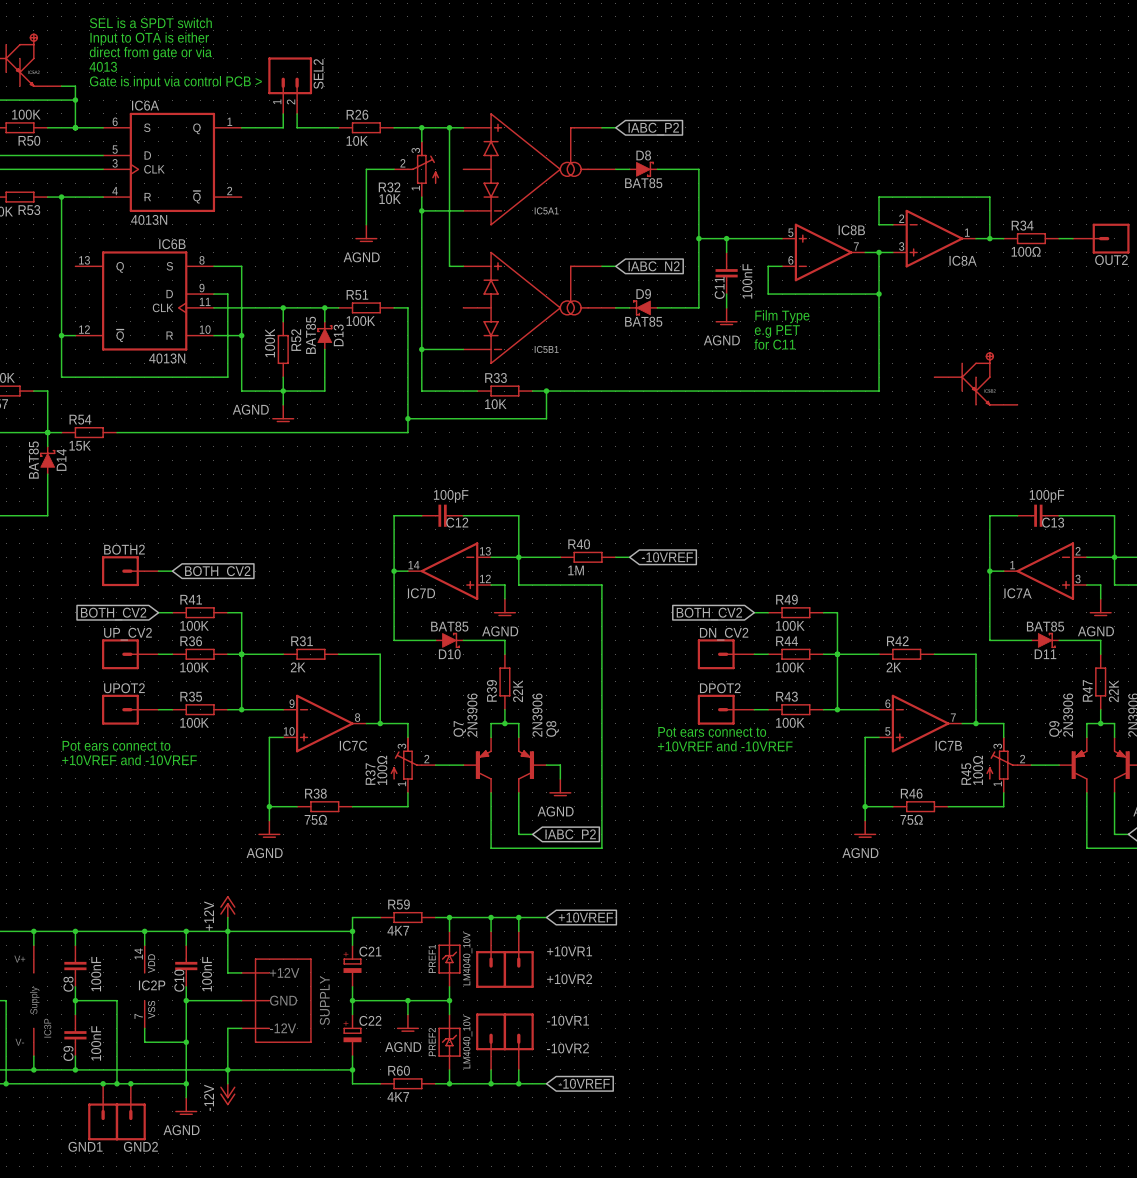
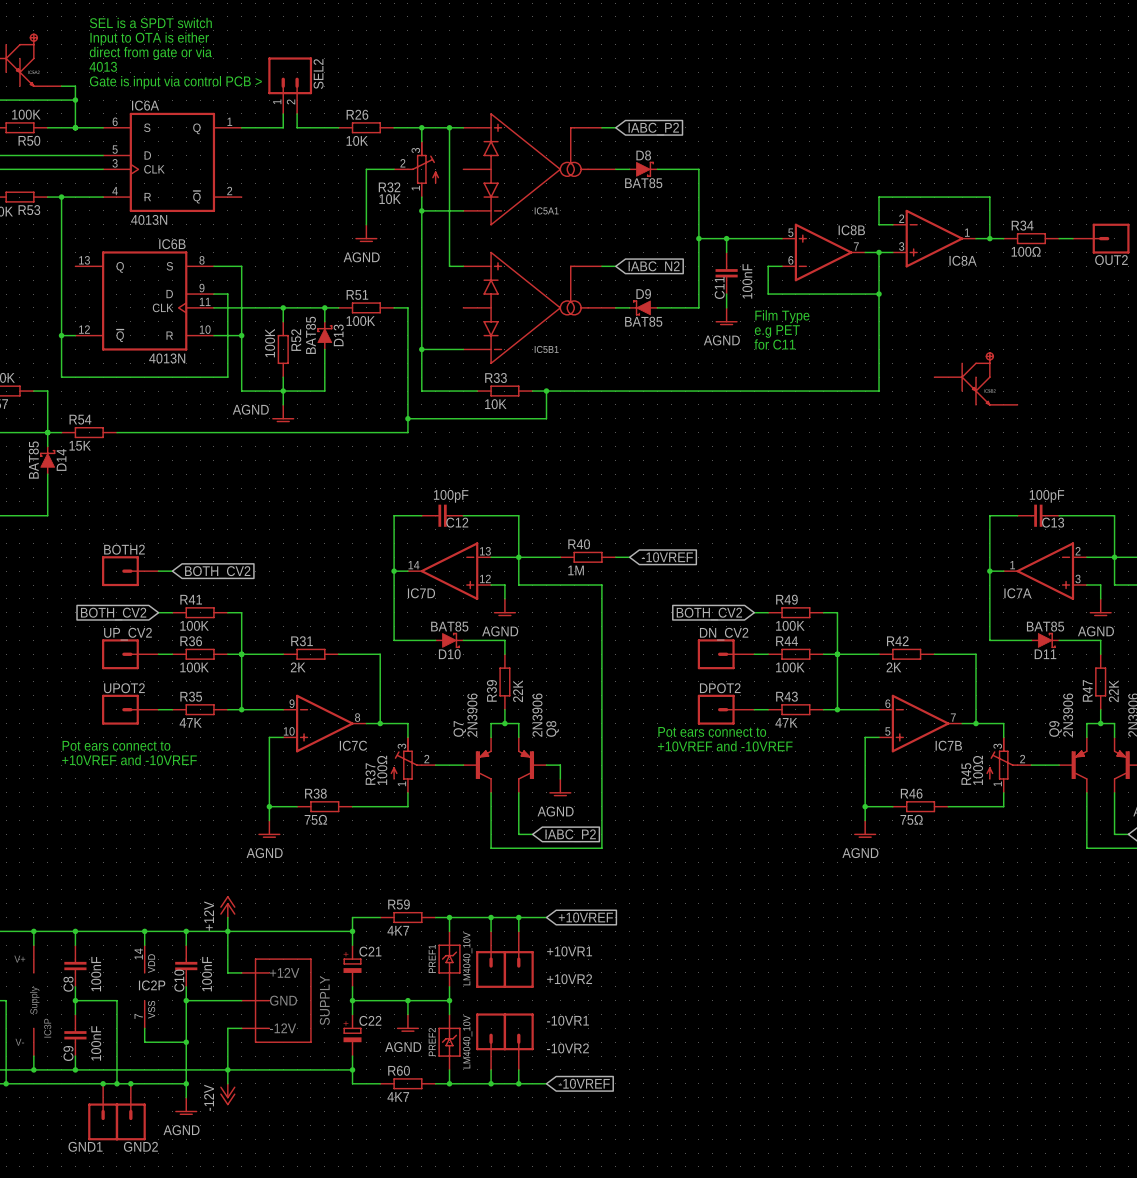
R35 value: 100K (194, 722) -> 47K (190, 722)
R43 value: 100K (790, 722) -> 47K (786, 722)

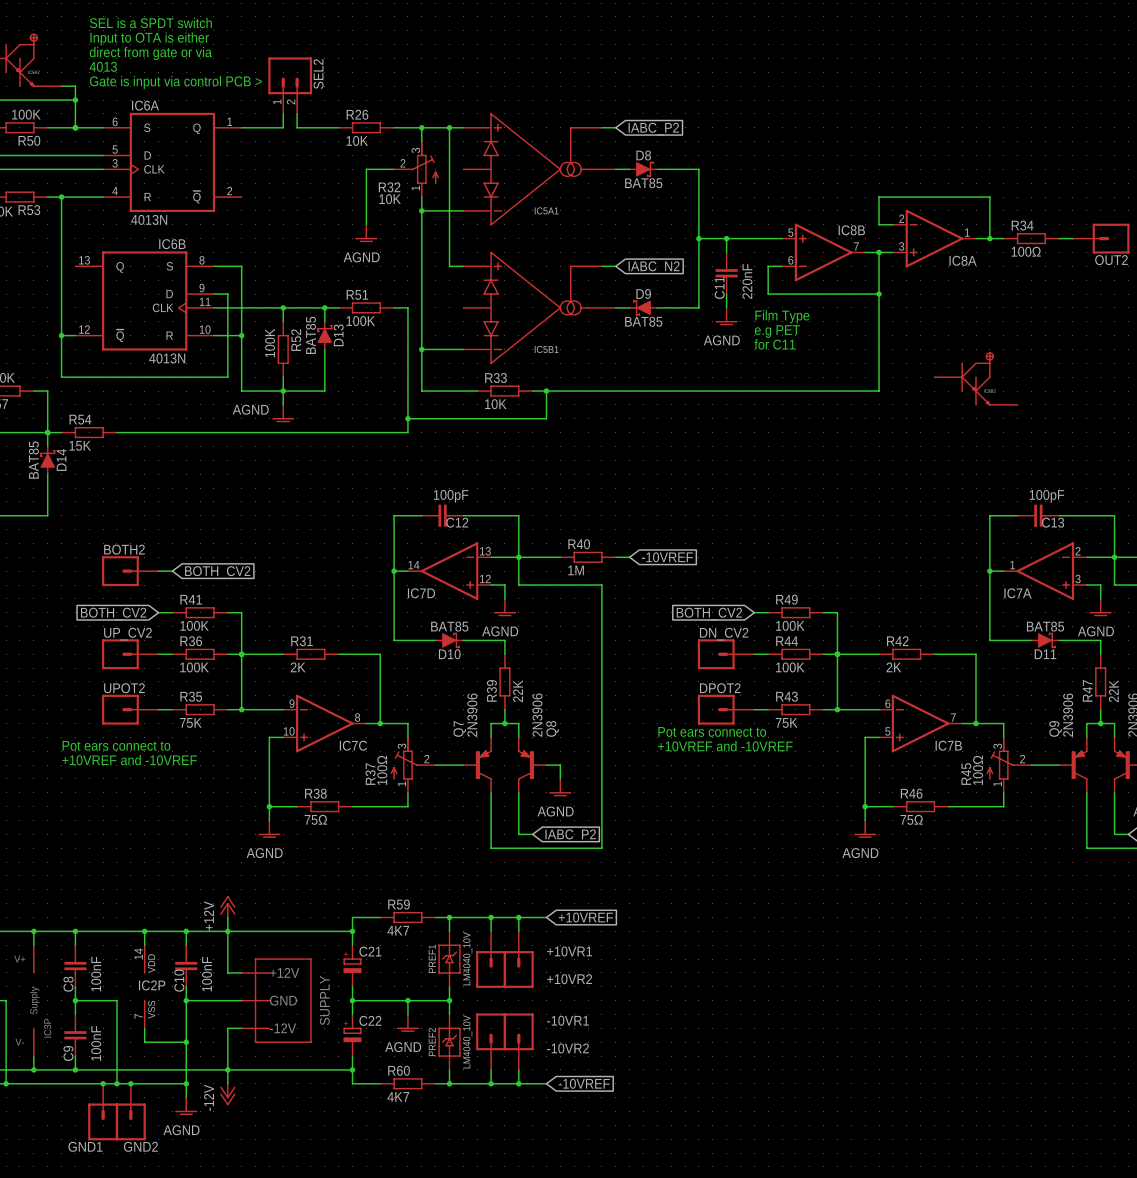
C11 value: 100nF (747, 281) -> 220nF (747, 281)
R35 value: 47K (190, 722) -> 75K (190, 722)
R43 value: 47K (786, 722) -> 75K (786, 722)

